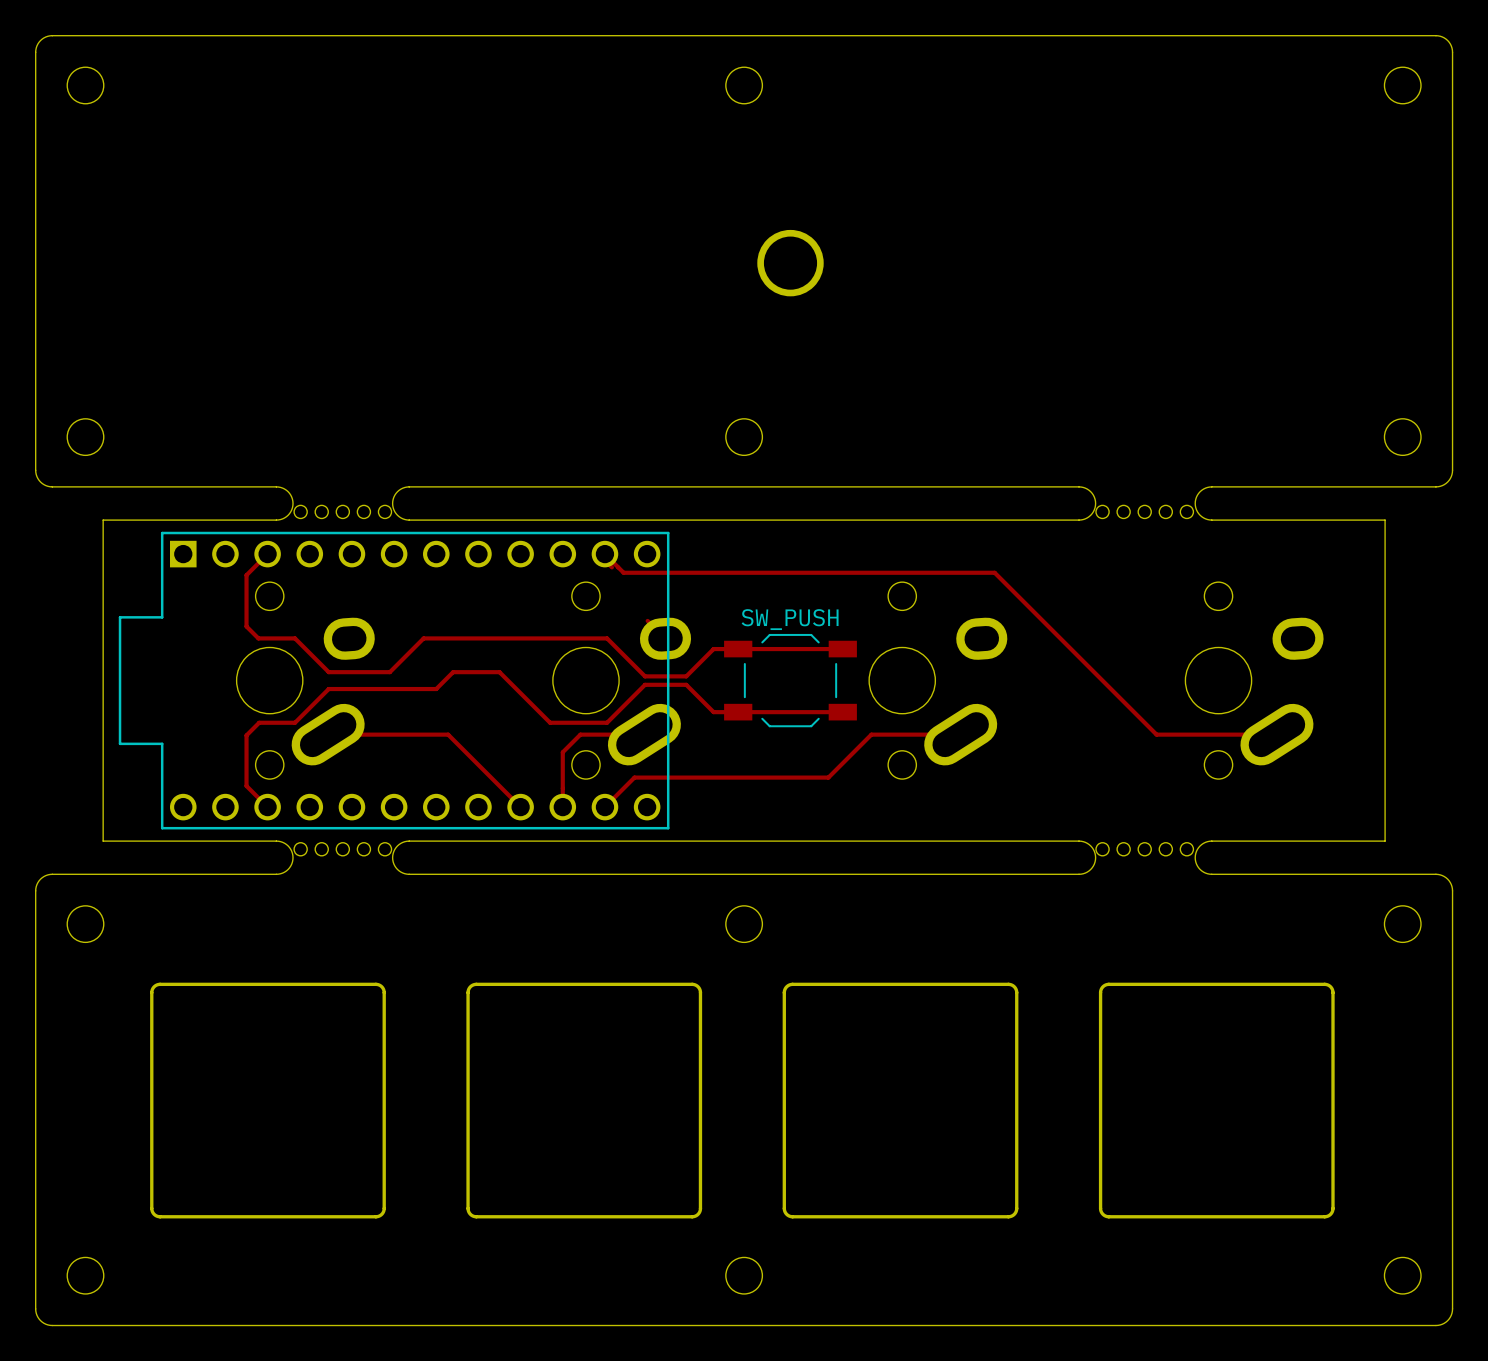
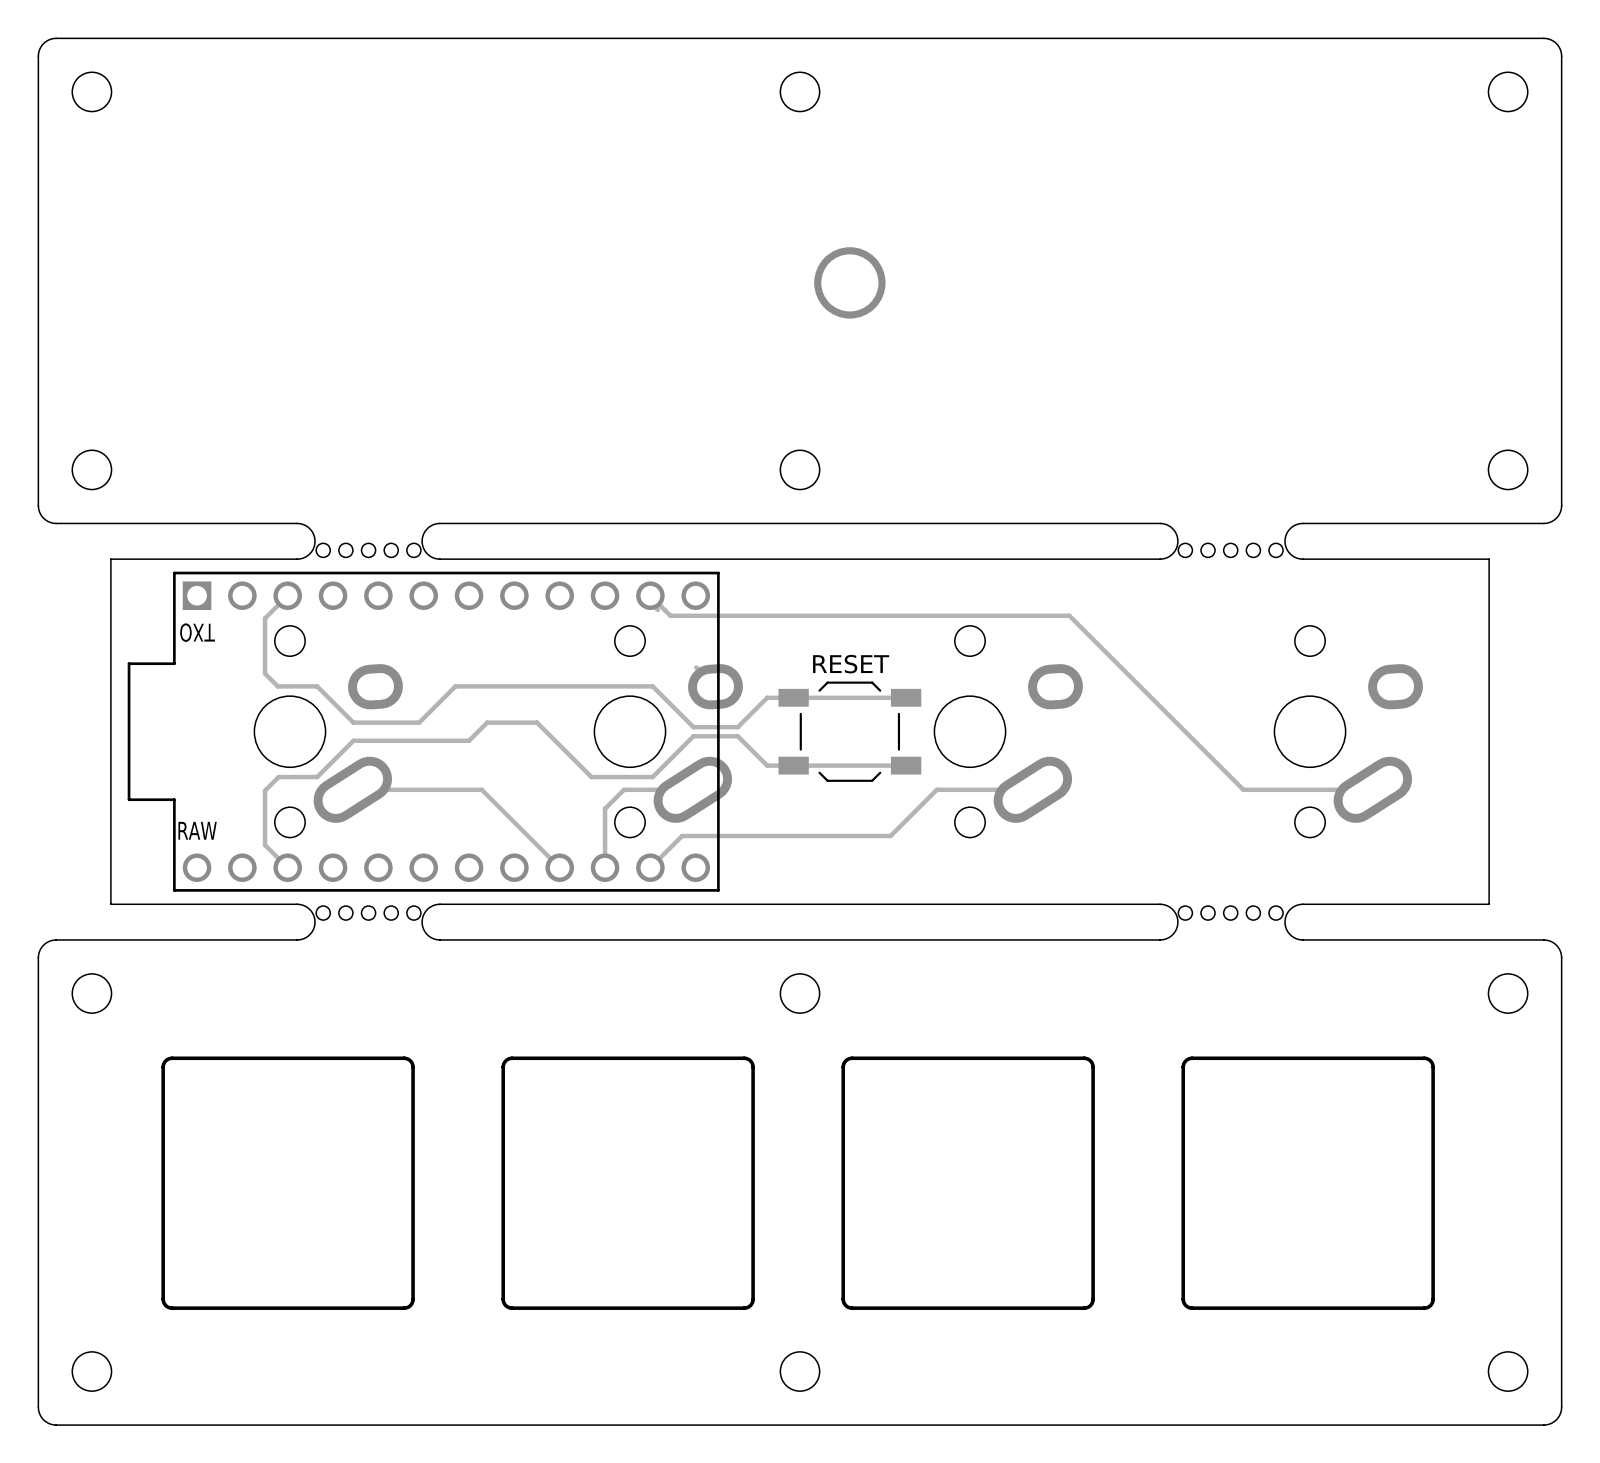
text: none -> TXO (197, 632)
part value: SW_PUSH (790, 619) -> RESET (851, 664)
text: none -> RAW (197, 830)

